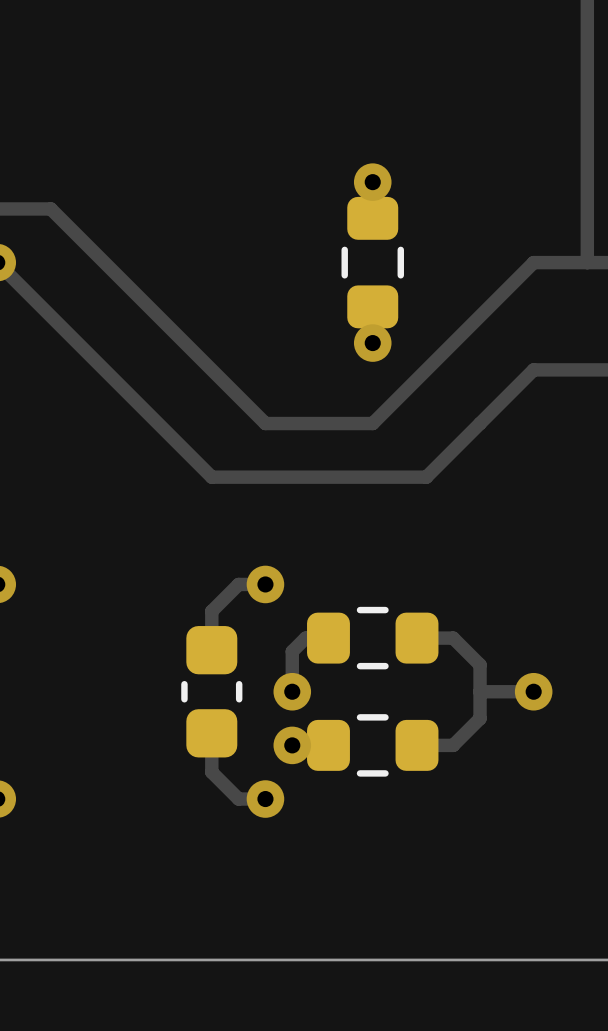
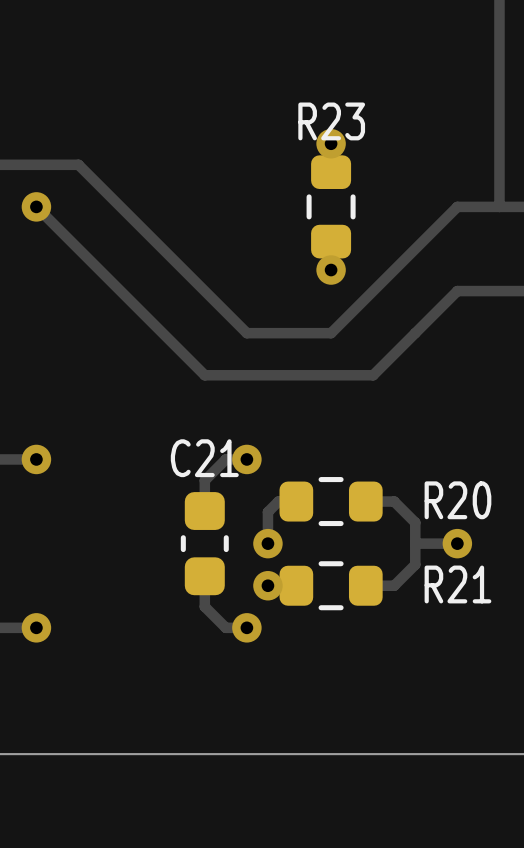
R23 name: none -> R23 (331, 121)
C21 name: none -> C21 (204, 458)
R20 name: none -> R20 (457, 500)
R21 name: none -> R21 (457, 584)

